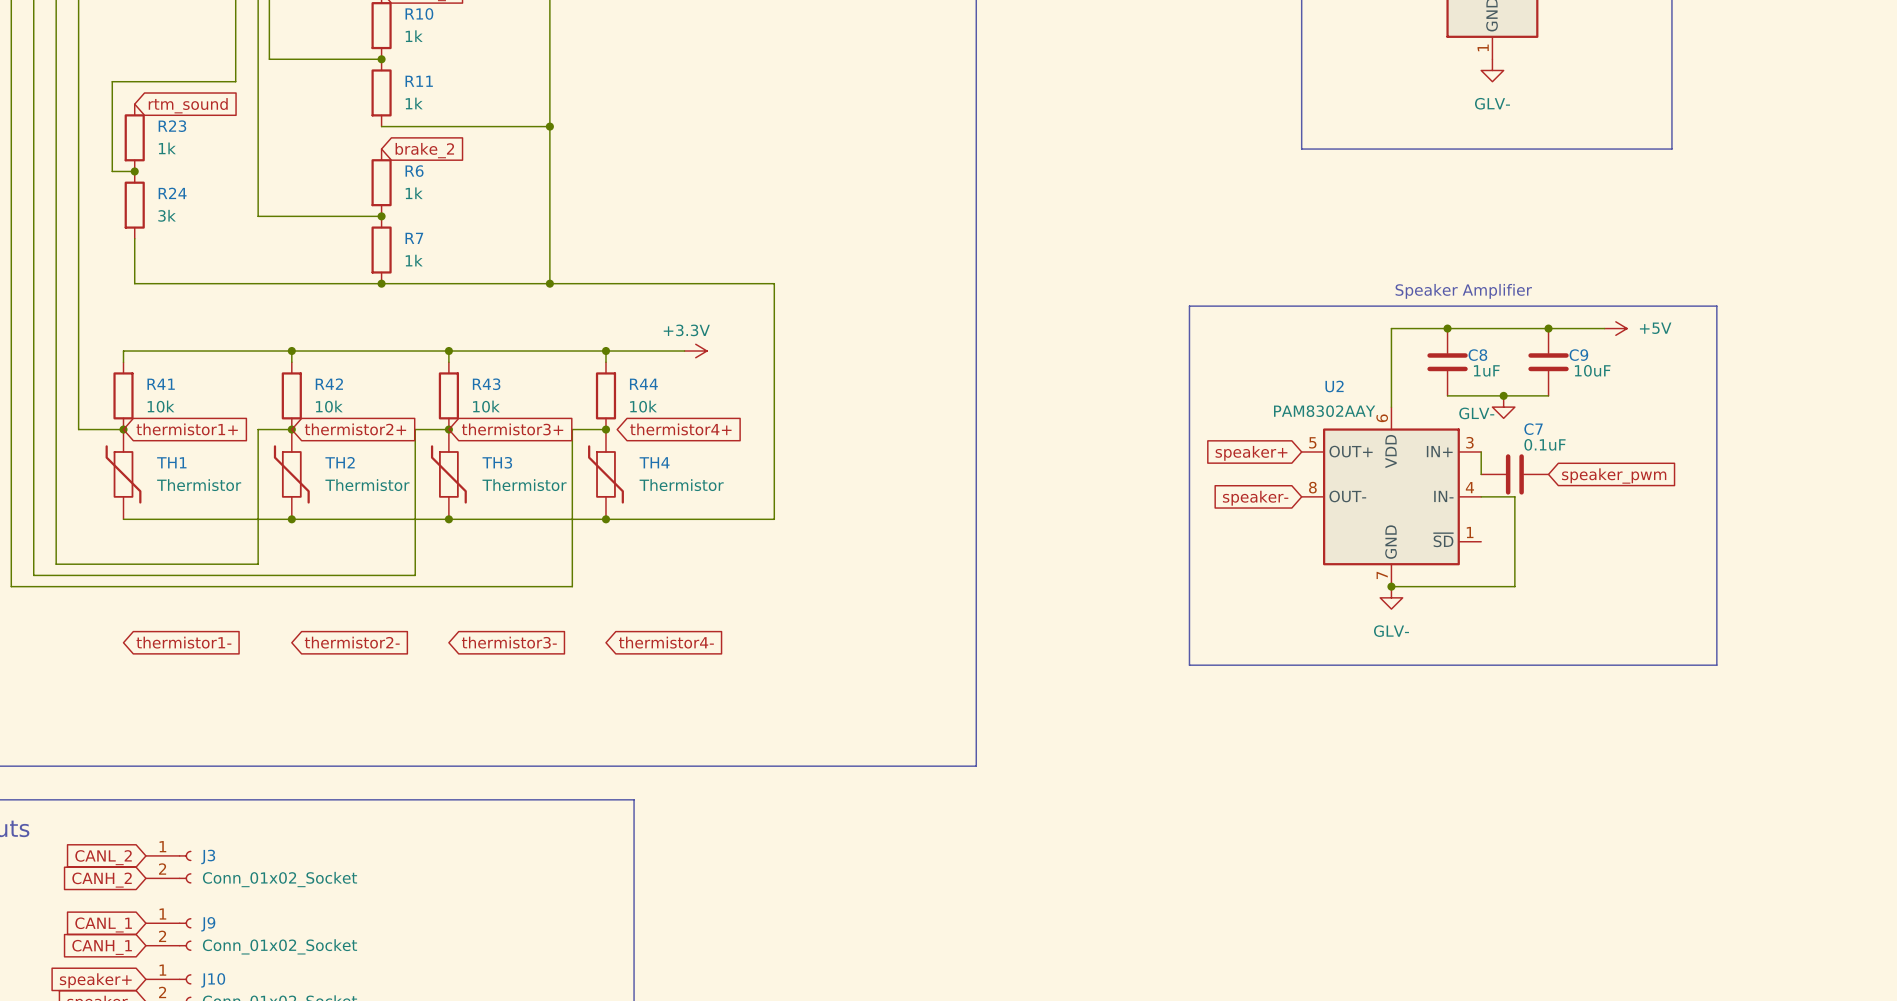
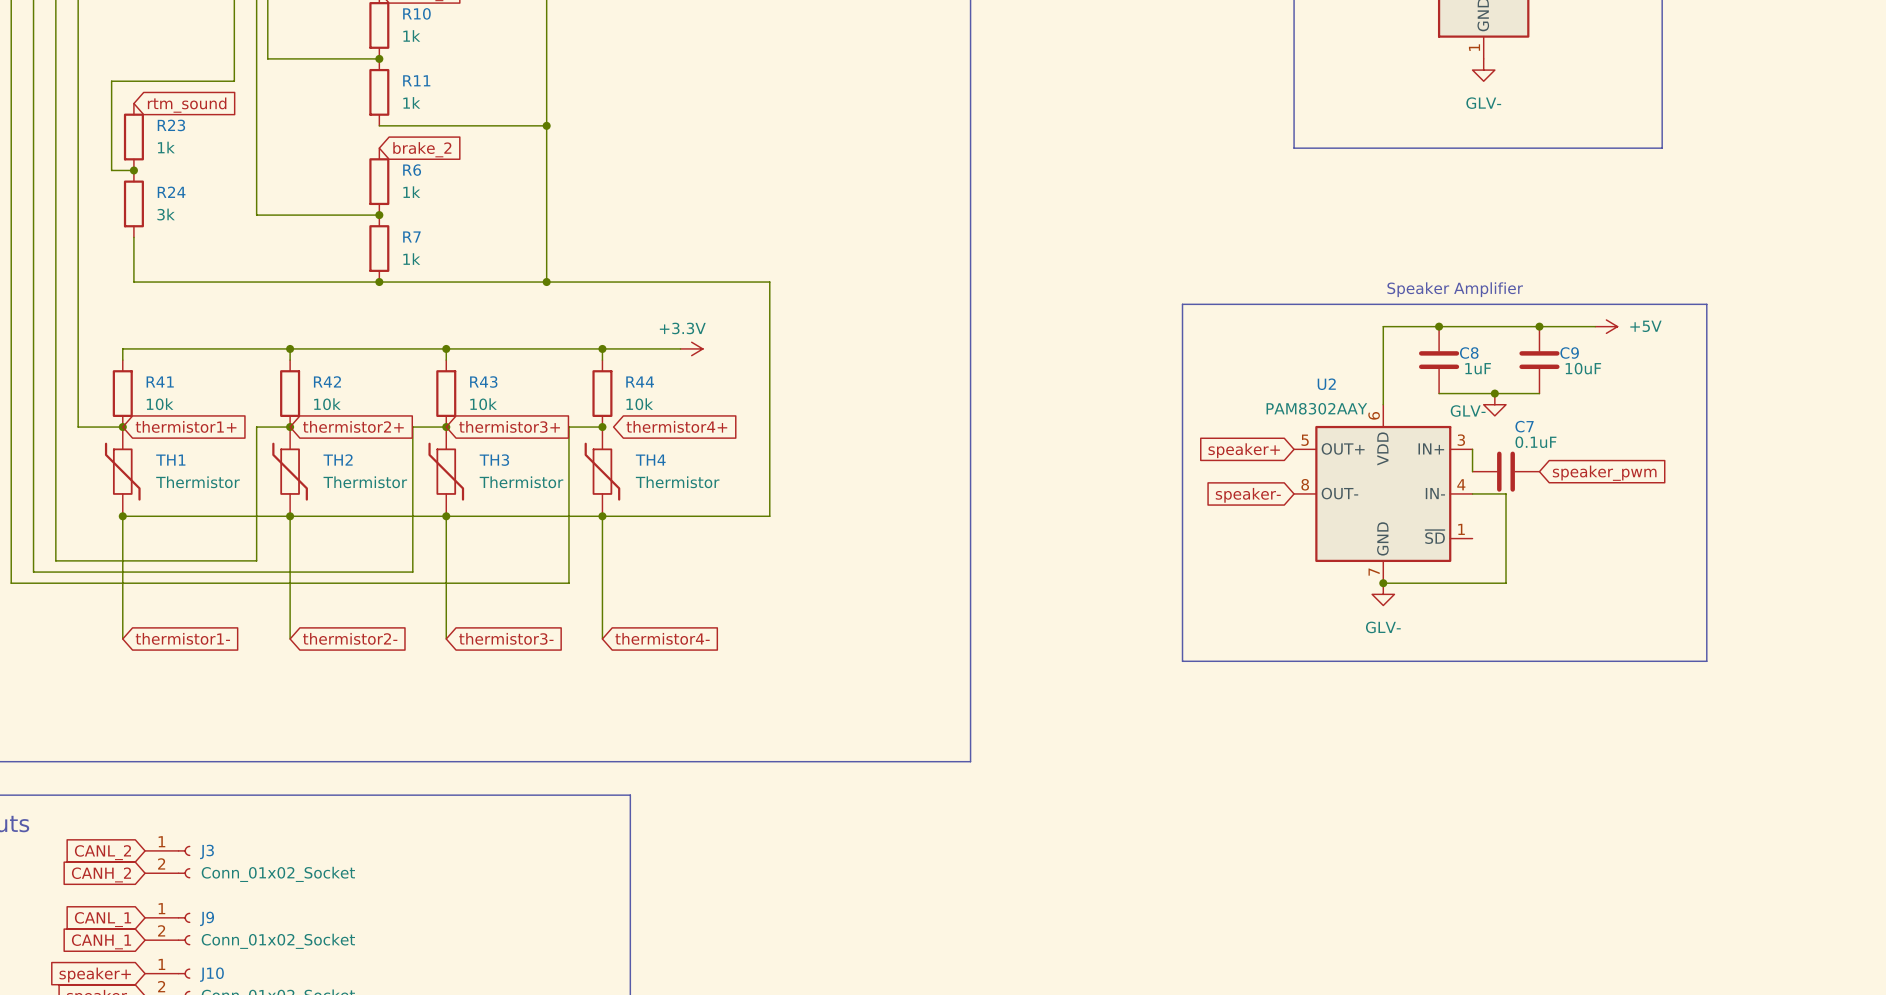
wire: none -> (122, 516) (122, 638)
junction: none -> (122, 516)
wire: none -> (290, 516) (290, 638)
wire: none -> (446, 516) (446, 638)
wire: none -> (602, 516) (602, 638)

